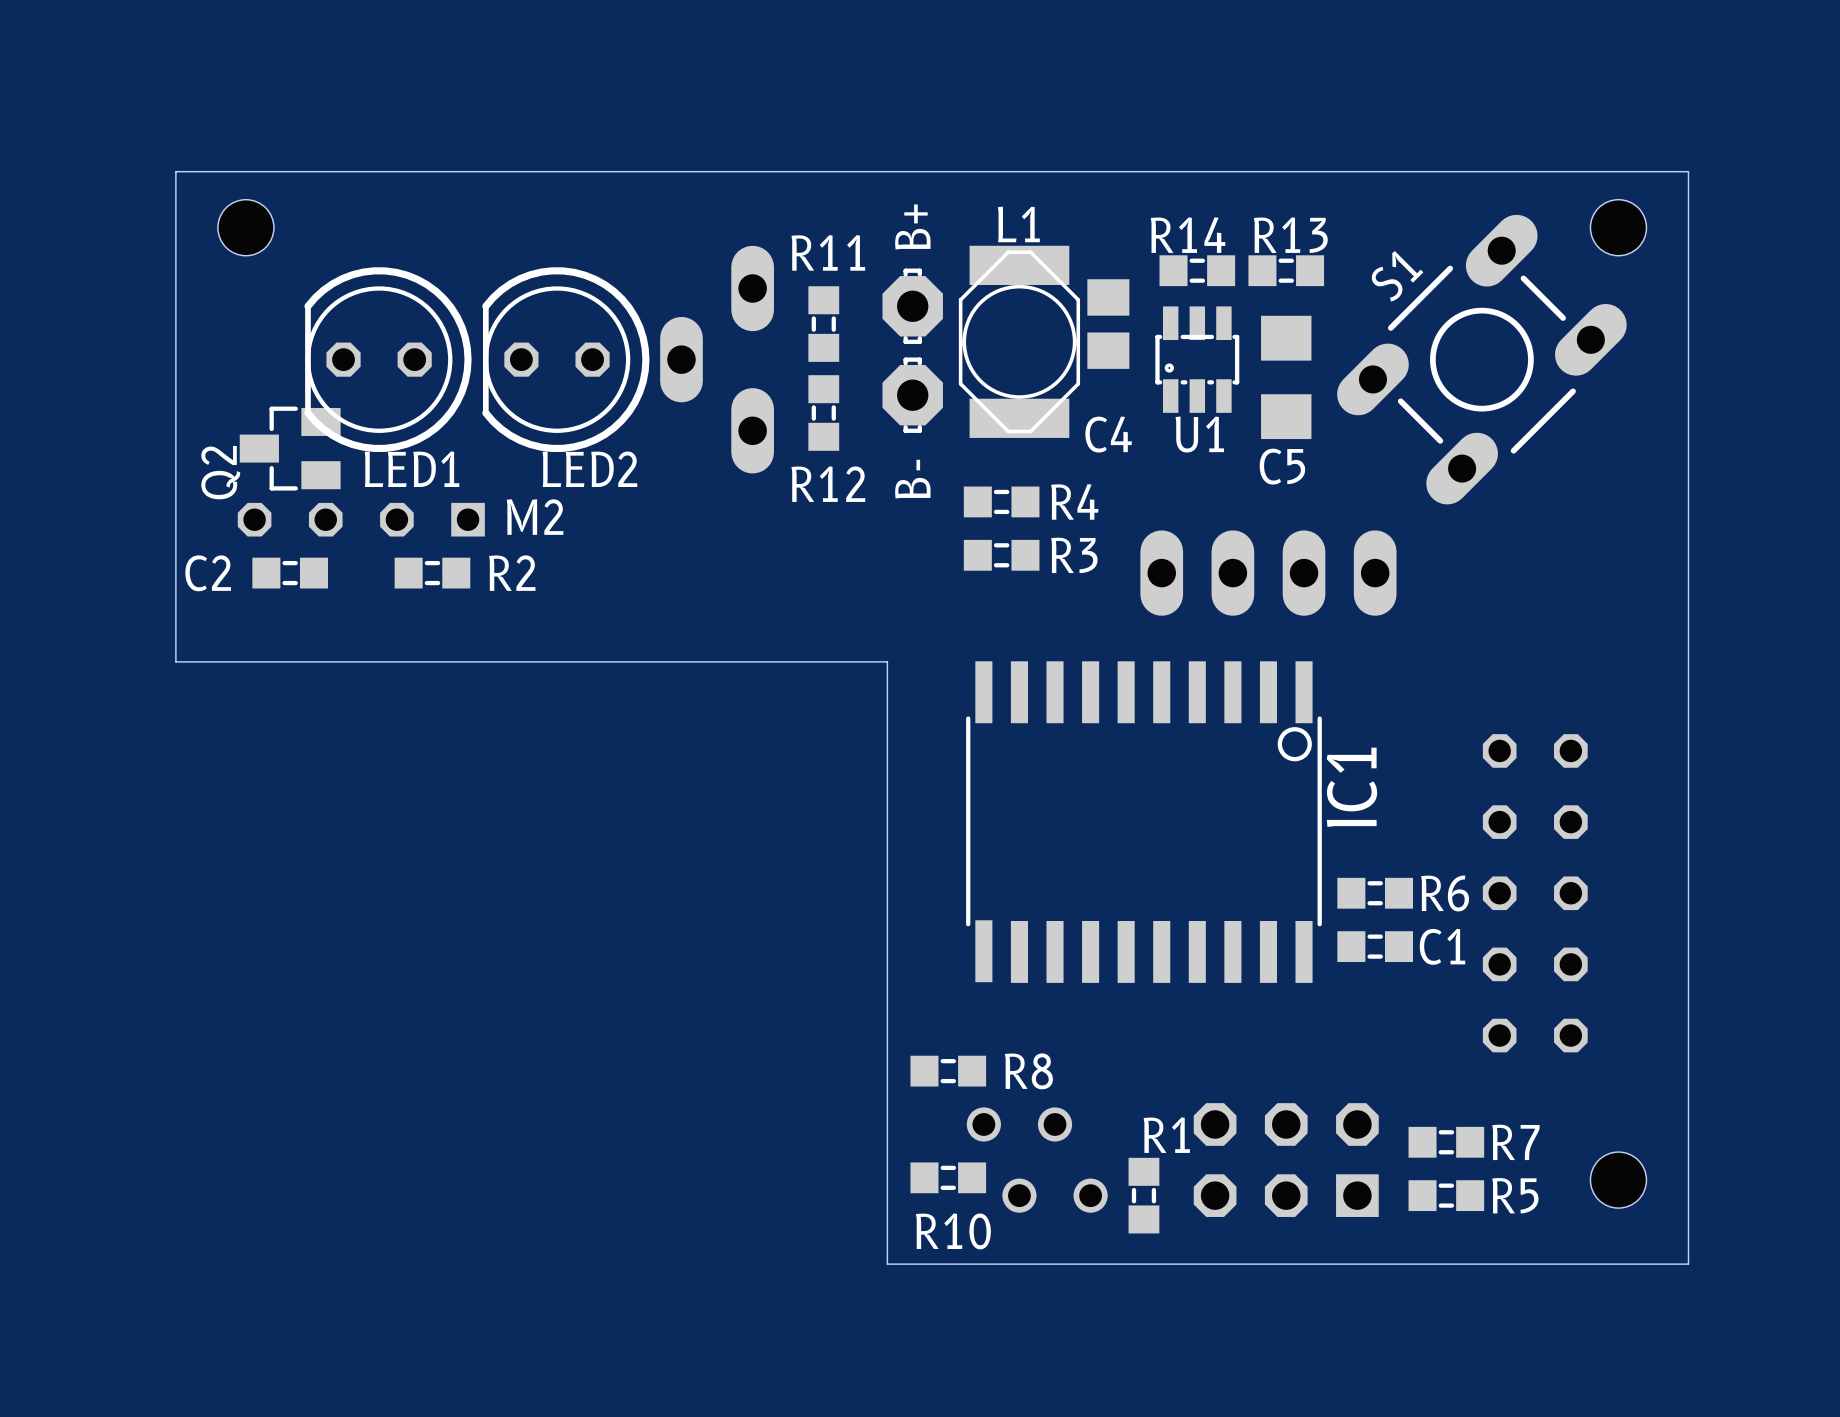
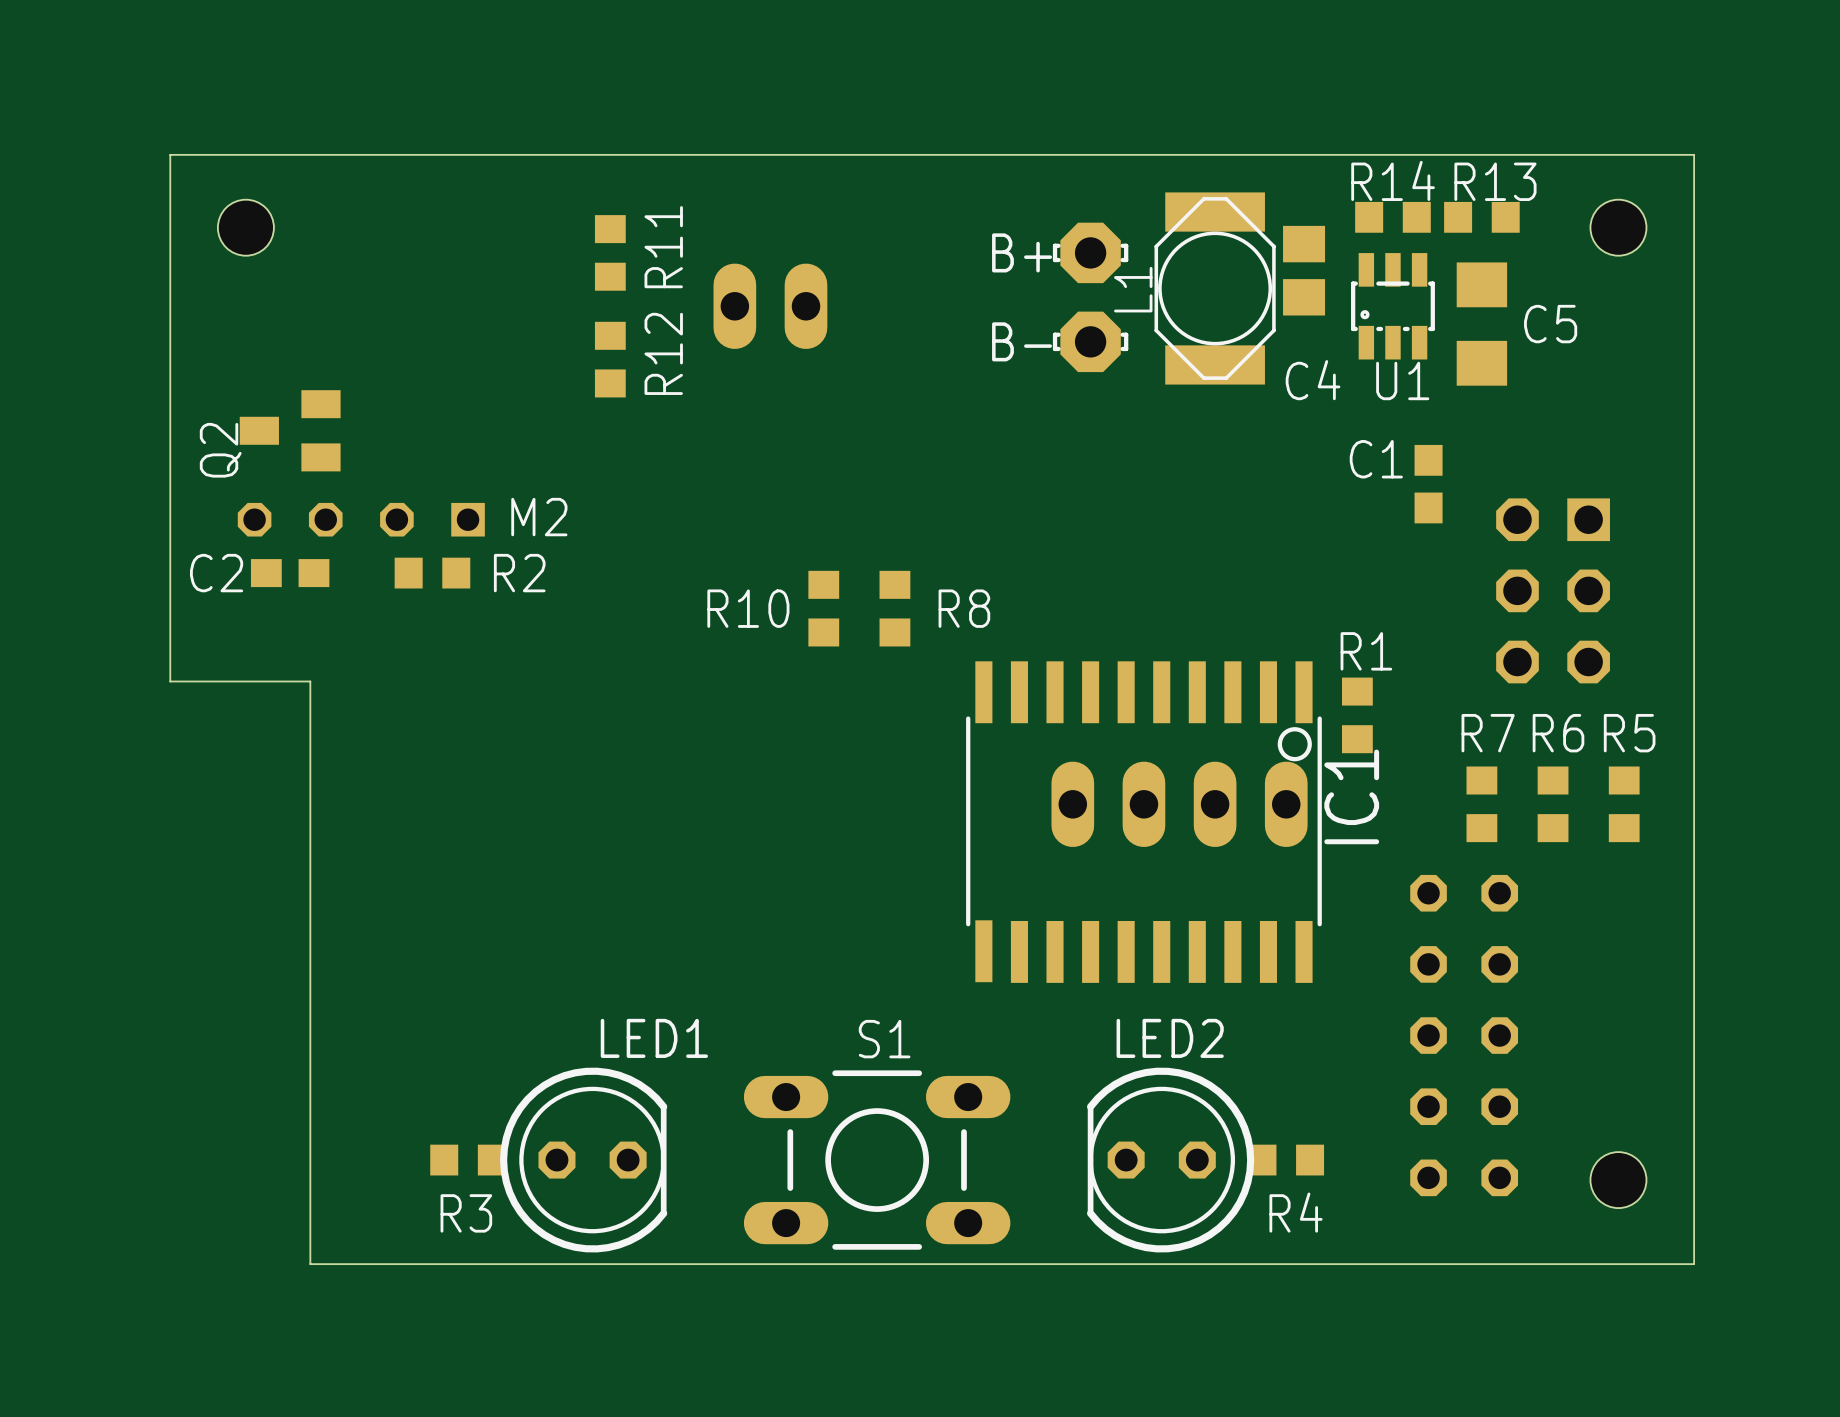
S1 footprint: [1337, 214, 1627, 505] -> [743, 1070, 1011, 1250]
L1 name rotation: 0° (1018, 224) -> 90° counterclockwise (1133, 289)
L1 name position: L1 (1018, 224) -> L1 (1133, 289)
B+ name position: B+ (912, 227) -> B+ (1022, 252)
R11 name position: R11 (828, 252) -> R11 (663, 247)
R14 footprint: [1159, 255, 1236, 287] -> [1355, 201, 1431, 233]
R13 footprint: [1248, 255, 1325, 287] -> [1444, 201, 1520, 233]
LED1 footprint: [304, 267, 472, 453] -> [500, 1067, 668, 1253]
LED2 footprint: [482, 267, 650, 453] -> [1087, 1067, 1255, 1253]
S1 name position: S1 (1397, 276) -> S1 (884, 1039)
R11 footprint: [808, 286, 840, 362] -> [594, 215, 626, 291]
part: none -> (770, 306)
B+ rotation: 0° (912, 306) -> 90° clockwise (1090, 252)
B+ position: (912, 306) -> (1090, 252)
C4 position: (1108, 324) -> (1304, 270)
L1 position: (1019, 341) -> (1215, 288)
part: (717, 359) -> none
U1 position: (1197, 359) -> (1392, 306)
R12 footprint: [808, 375, 840, 451] -> [594, 321, 626, 398]
C5 position: (1286, 377) -> (1481, 324)
B- rotation: 0° (912, 395) -> 90° clockwise (1090, 341)
B- position: (912, 395) -> (1090, 341)
Q2 footprint: [239, 406, 341, 491] -> [239, 390, 341, 472]
C5 name position: C5 (1282, 466) -> C5 (1550, 324)
LED1 name position: LED1 (411, 469) -> LED1 (654, 1038)
LED2 name position: LED2 (589, 469) -> LED2 (1170, 1038)
R12 name position: R12 (828, 484) -> R12 (663, 353)
R4 footprint: [963, 486, 1040, 518] -> [1248, 1144, 1325, 1176]
R4 name position: R4 (1074, 501) -> R4 (1296, 1212)
R3 footprint: [963, 539, 1040, 571] -> [430, 1144, 506, 1176]
R3 name position: R3 (1074, 555) -> R3 (466, 1213)
C2 footprint: [252, 557, 328, 589] -> [250, 559, 330, 588]
R2 footprint: [394, 557, 471, 589] -> [394, 557, 471, 589]
part position: (1268, 573) -> (1179, 804)
R6 footprint: [1337, 877, 1414, 909] -> [1537, 766, 1569, 843]
R6 name position: R6 (1445, 893) -> R6 (1558, 733)
part: (1535, 893) -> none
C1 footprint: [1337, 931, 1414, 963] -> [1414, 444, 1443, 524]
C1 name position: C1 (1442, 946) -> C1 (1376, 459)
part: none -> (1464, 1035)
R8 footprint: [910, 1055, 987, 1087] -> [879, 570, 911, 647]
R7 footprint: [1408, 1126, 1485, 1158] -> [1466, 766, 1498, 843]
R7 name position: R7 (1515, 1142) -> R7 (1488, 733)
R1 footprint: [1128, 1157, 1160, 1234] -> [1341, 677, 1373, 754]
part: (1037, 1160) -> none
part rotation: 0° (1286, 1160) -> 90° counterclockwise (1553, 590)
part position: (1286, 1160) -> (1553, 590)
R10 footprint: [910, 1162, 987, 1194] -> [808, 570, 840, 647]
R5 footprint: [1408, 1180, 1485, 1212] -> [1608, 766, 1640, 843]
R5 name position: R5 (1515, 1195) -> R5 (1629, 733)
R10 name position: R10 (953, 1231) -> R10 (748, 608)
board edge: (887, 1264) (887, 661) (175, 661) (175, 171) (1688, 171) (1688, 1264) -> (887, 1264) (310, 1264) (310, 681) (170, 681) (170, 154) (1694, 154) (1694, 1264) (1688, 1264)

